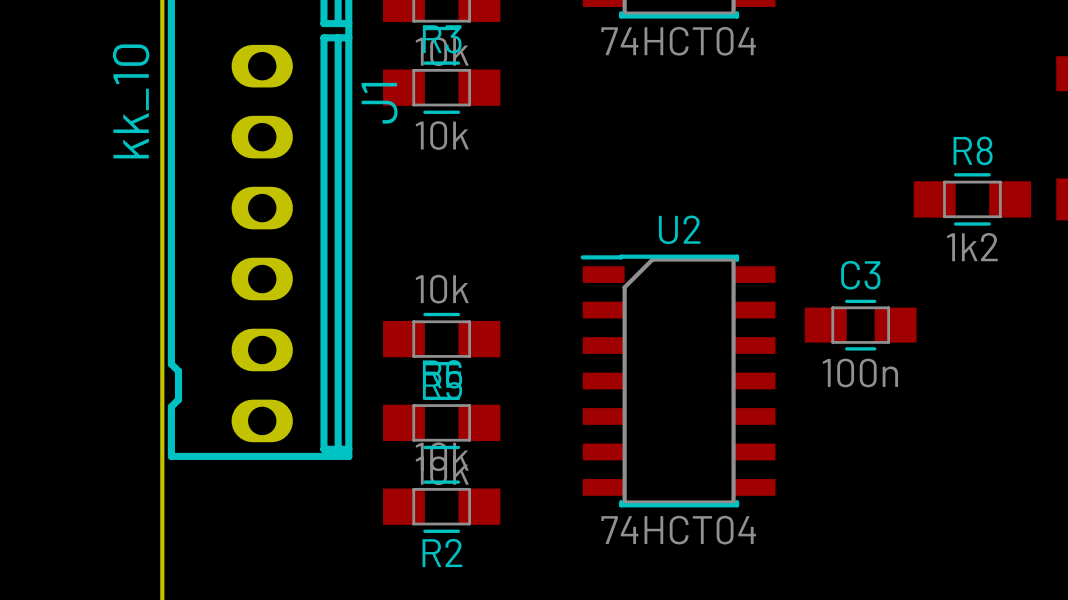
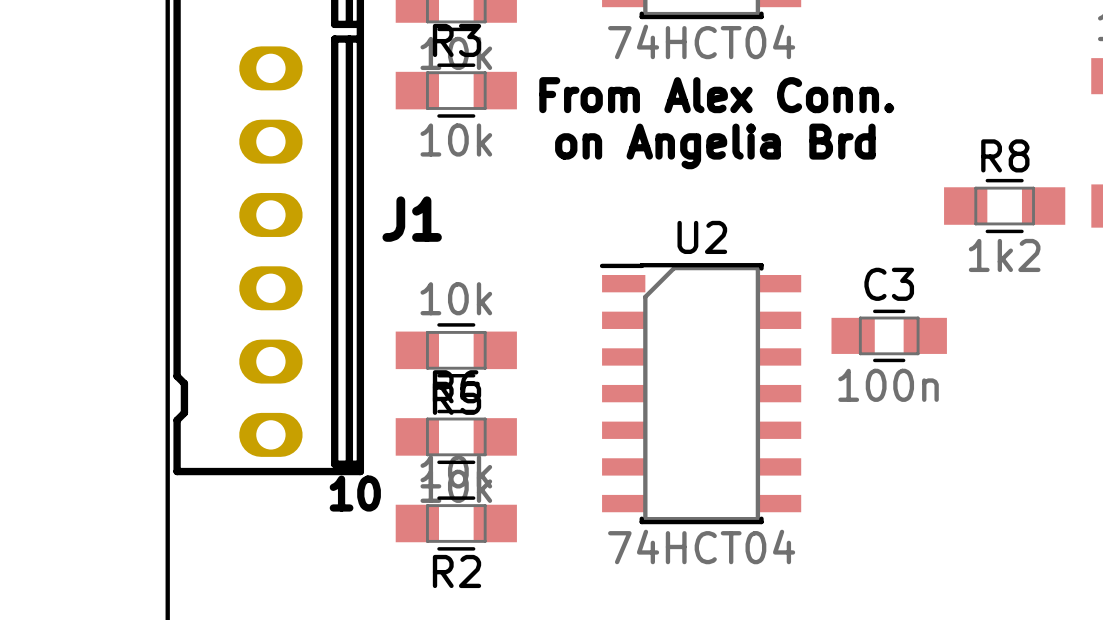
text: none -> From Alex Conn. (716, 95)
J1 value: kk_10 (131, 101) -> none
J1 name rotation: 0° (379, 103) -> 90° clockwise (412, 219)
J1 name position: J1 (379, 103) -> J1 (412, 219)
text: none -> on Angelia Brd (715, 146)
text: none -> 10 (355, 493)

